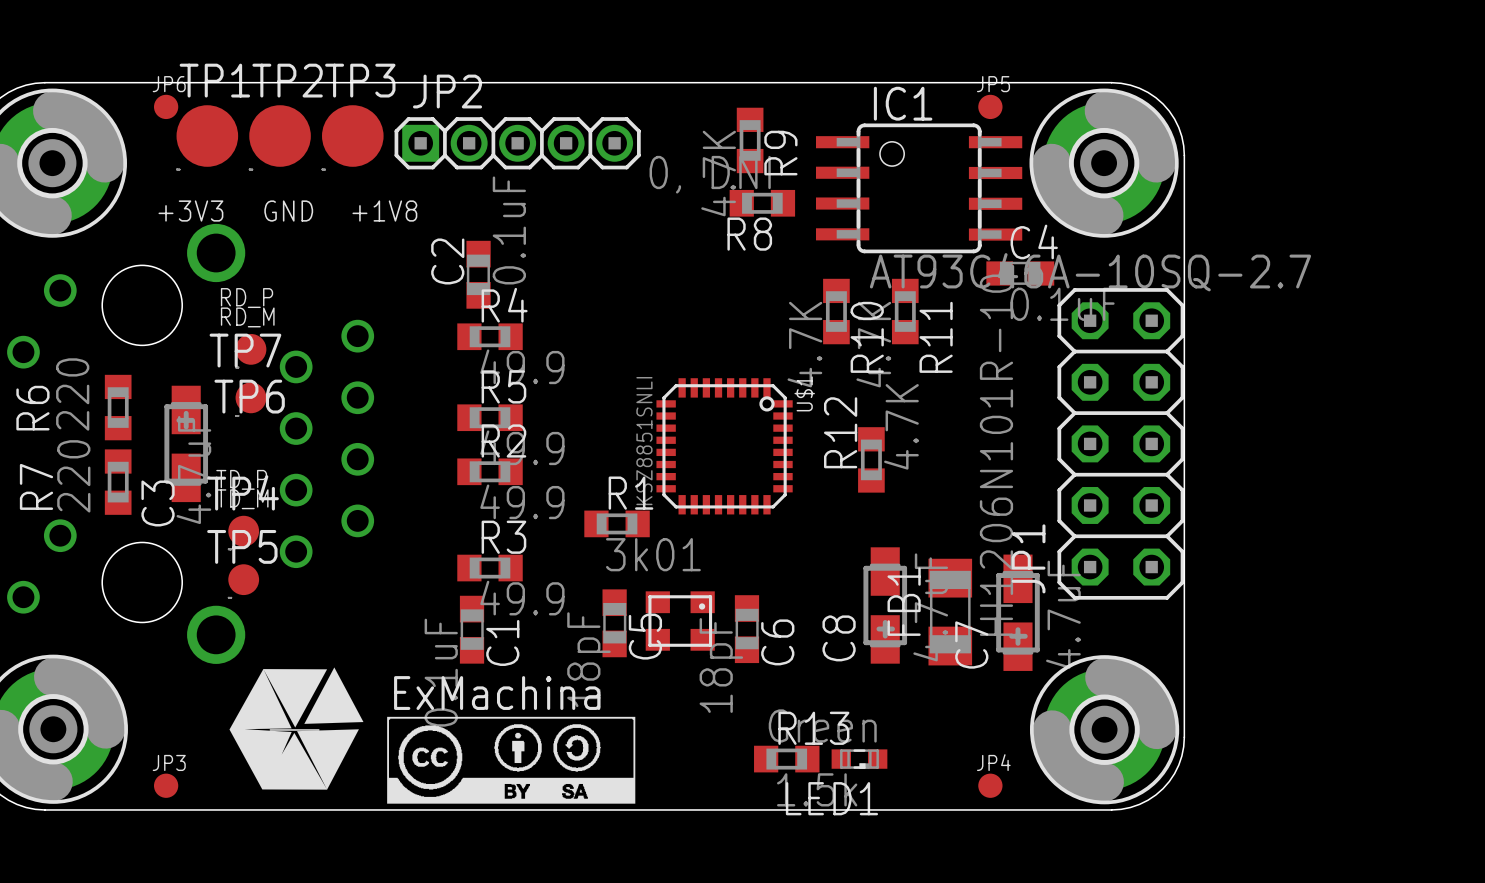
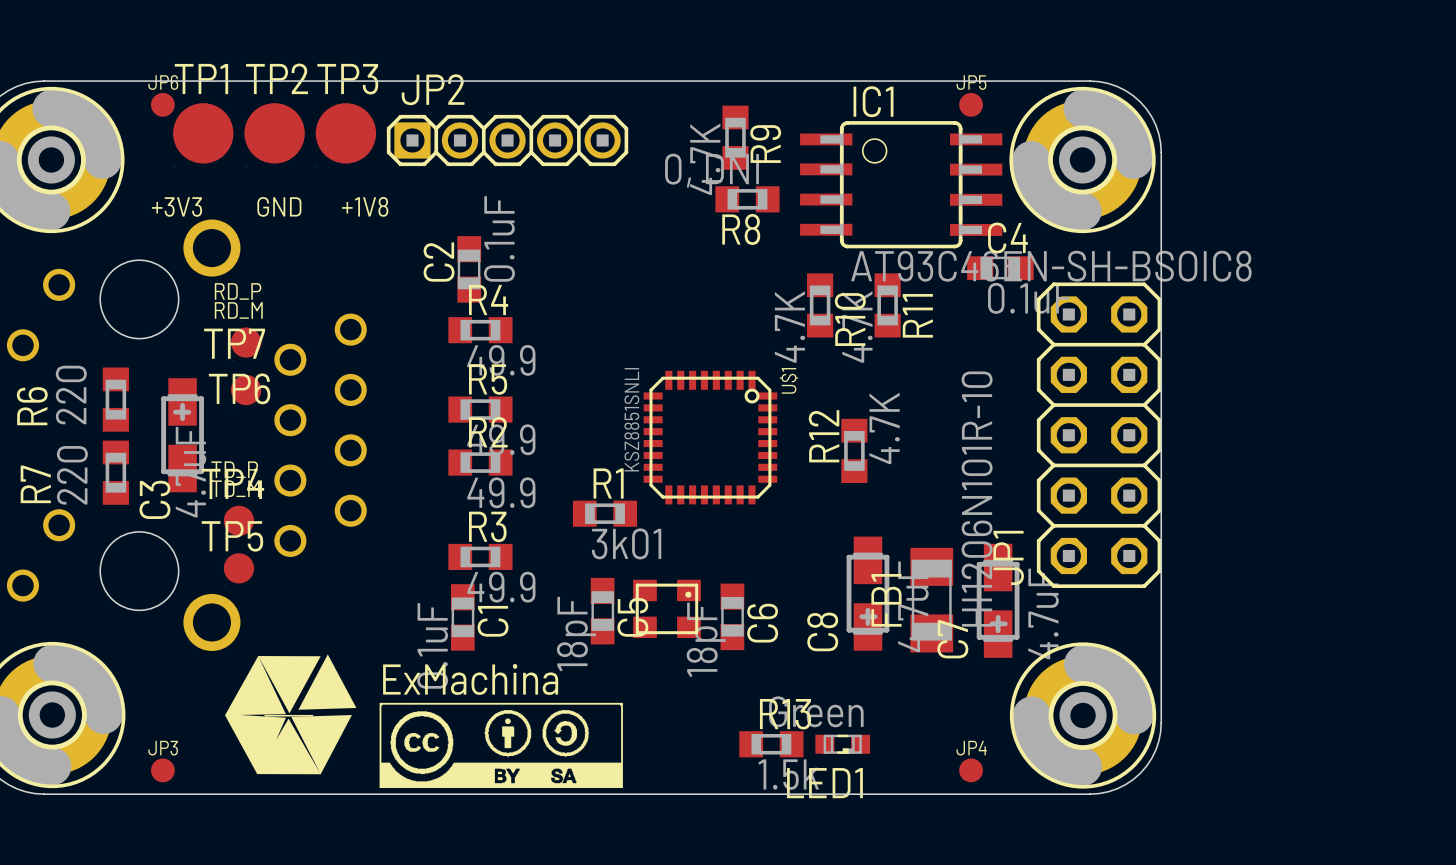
IC1 value: AT93C46A-10SQ-2.7 (1090, 272) -> AT93C46EN-SH-BSOIC8 (1051, 266)

